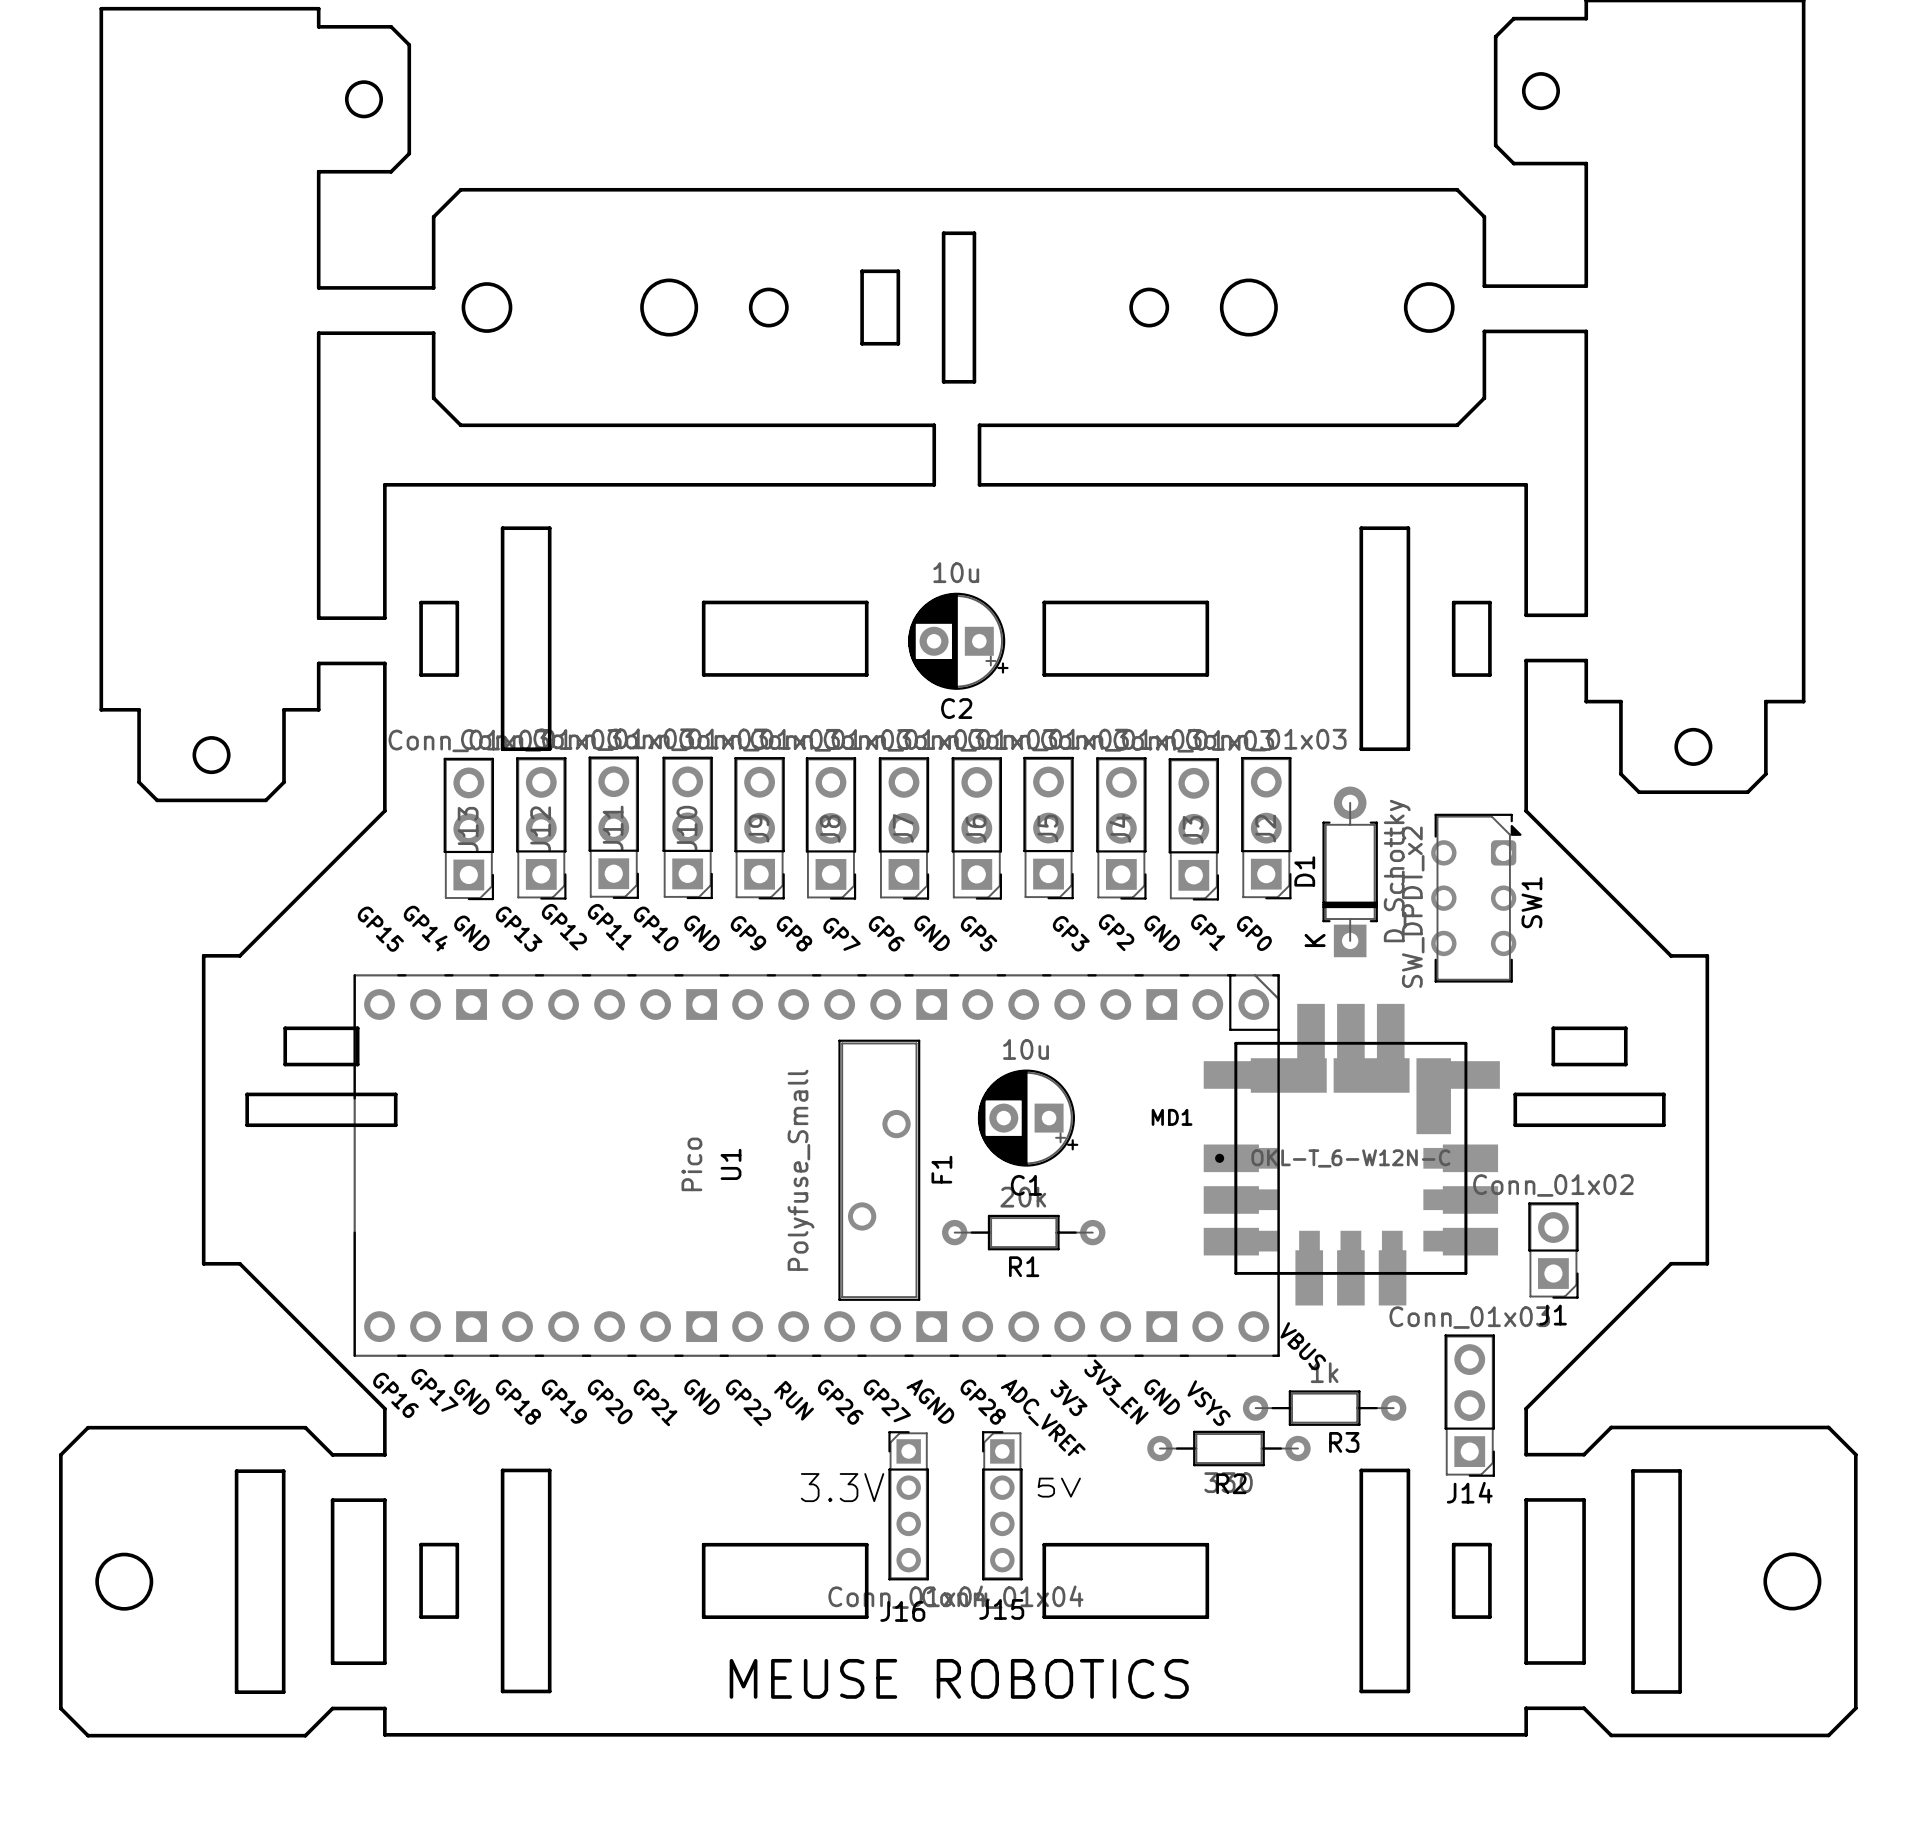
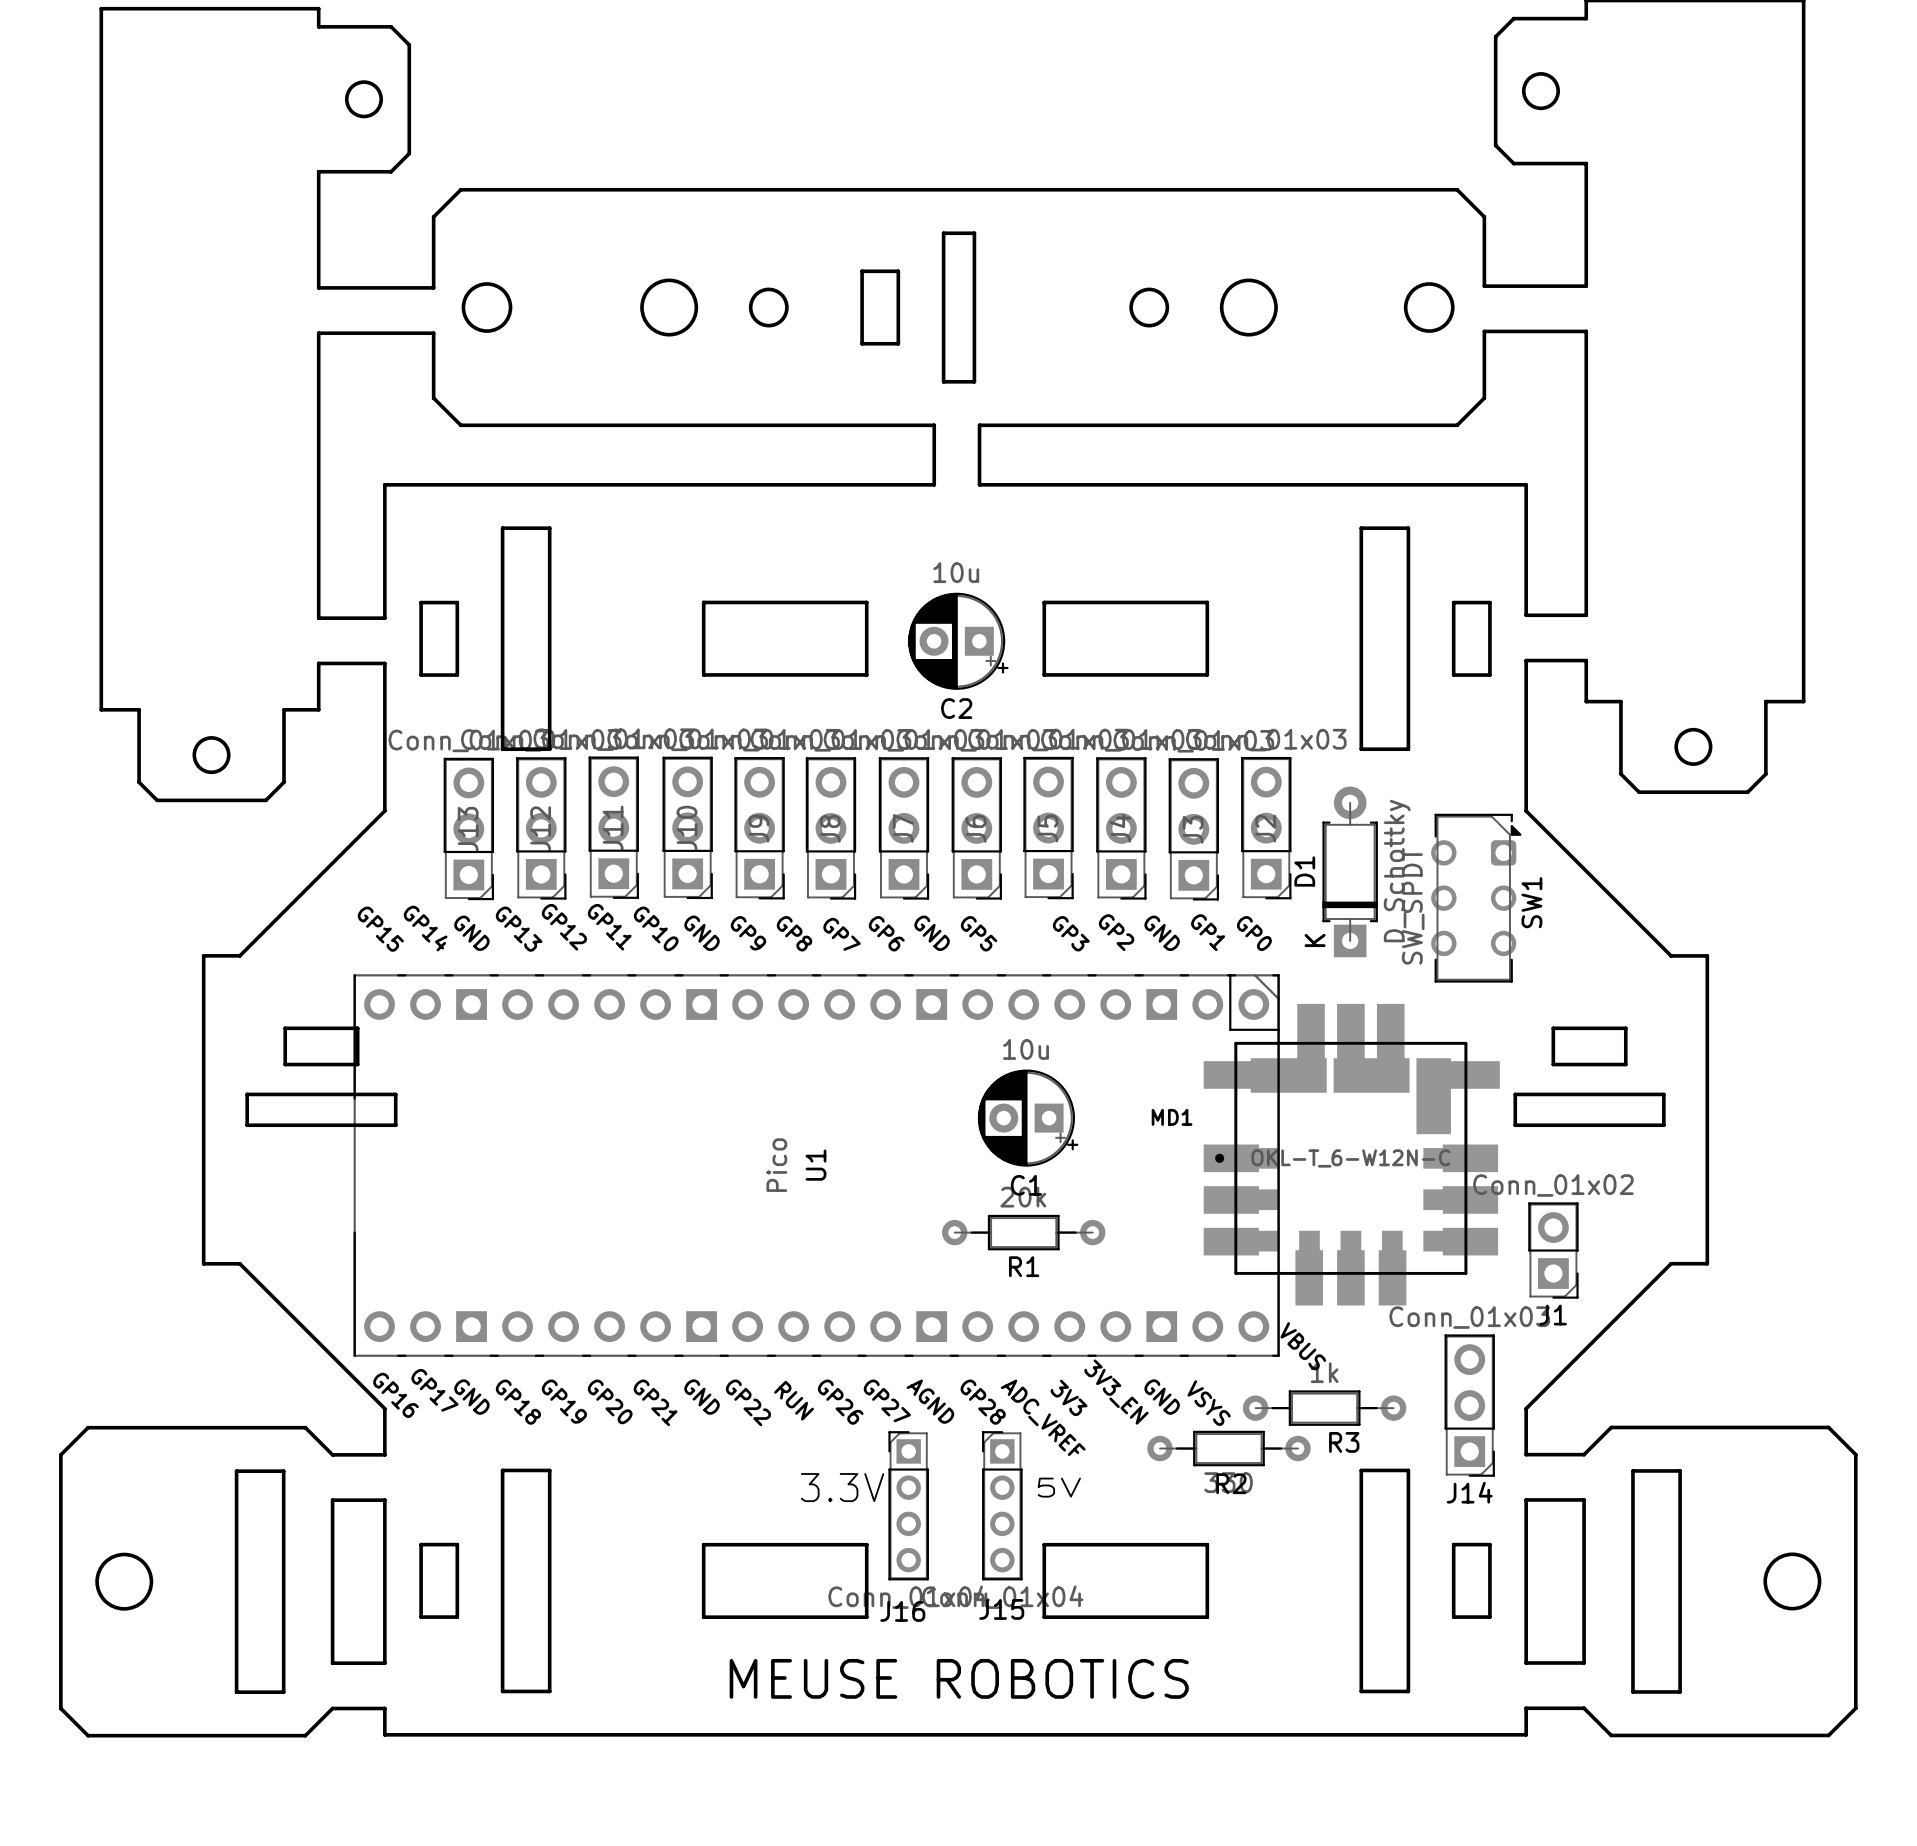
SW1 value: SW_DPDT_x2 (1413, 907) -> SW_SPDT (1413, 906)
U1 value position: Pico (691, 1164) -> Pico (776, 1165)
U1 name position: U1 (731, 1164) -> U1 (815, 1165)
F1: Polyfuse_Small (879, 1170) -> none

